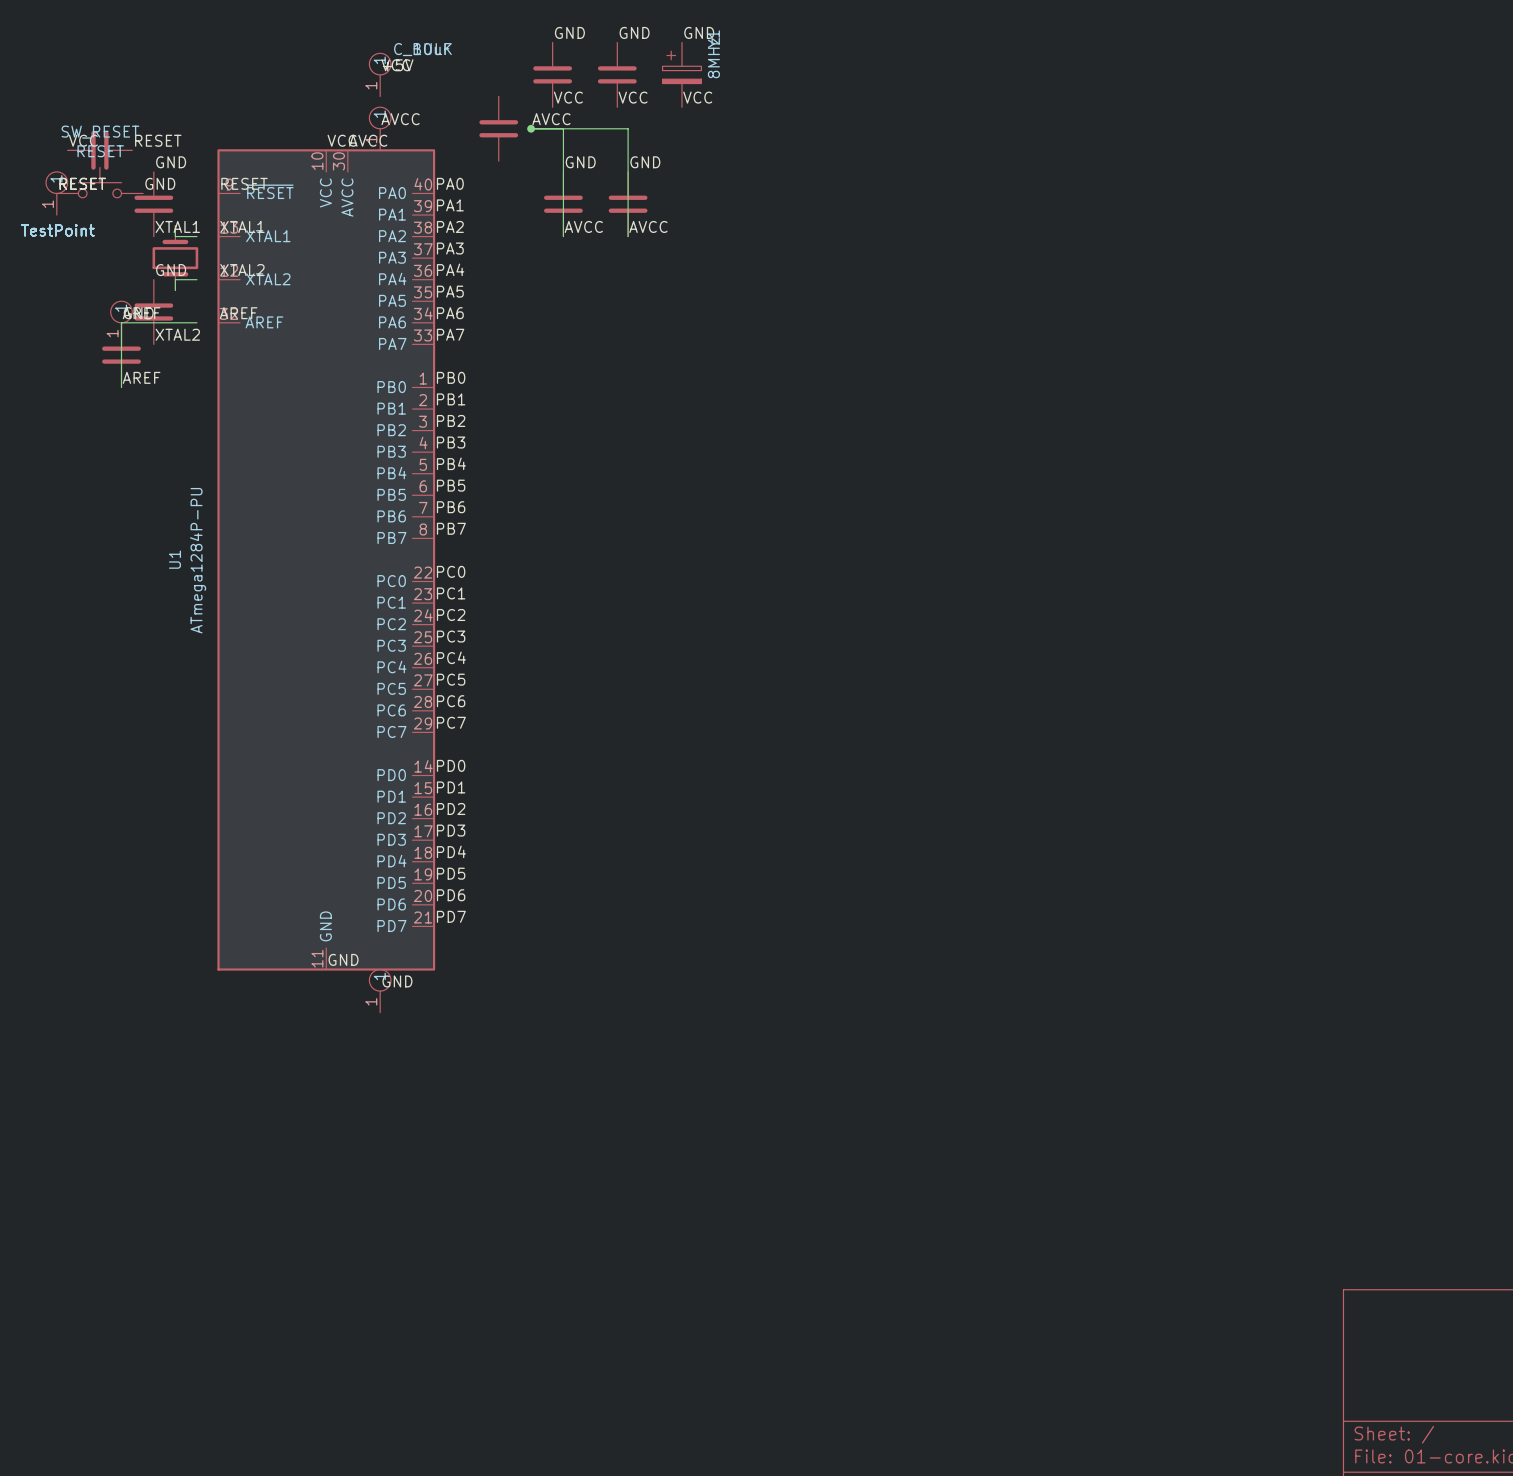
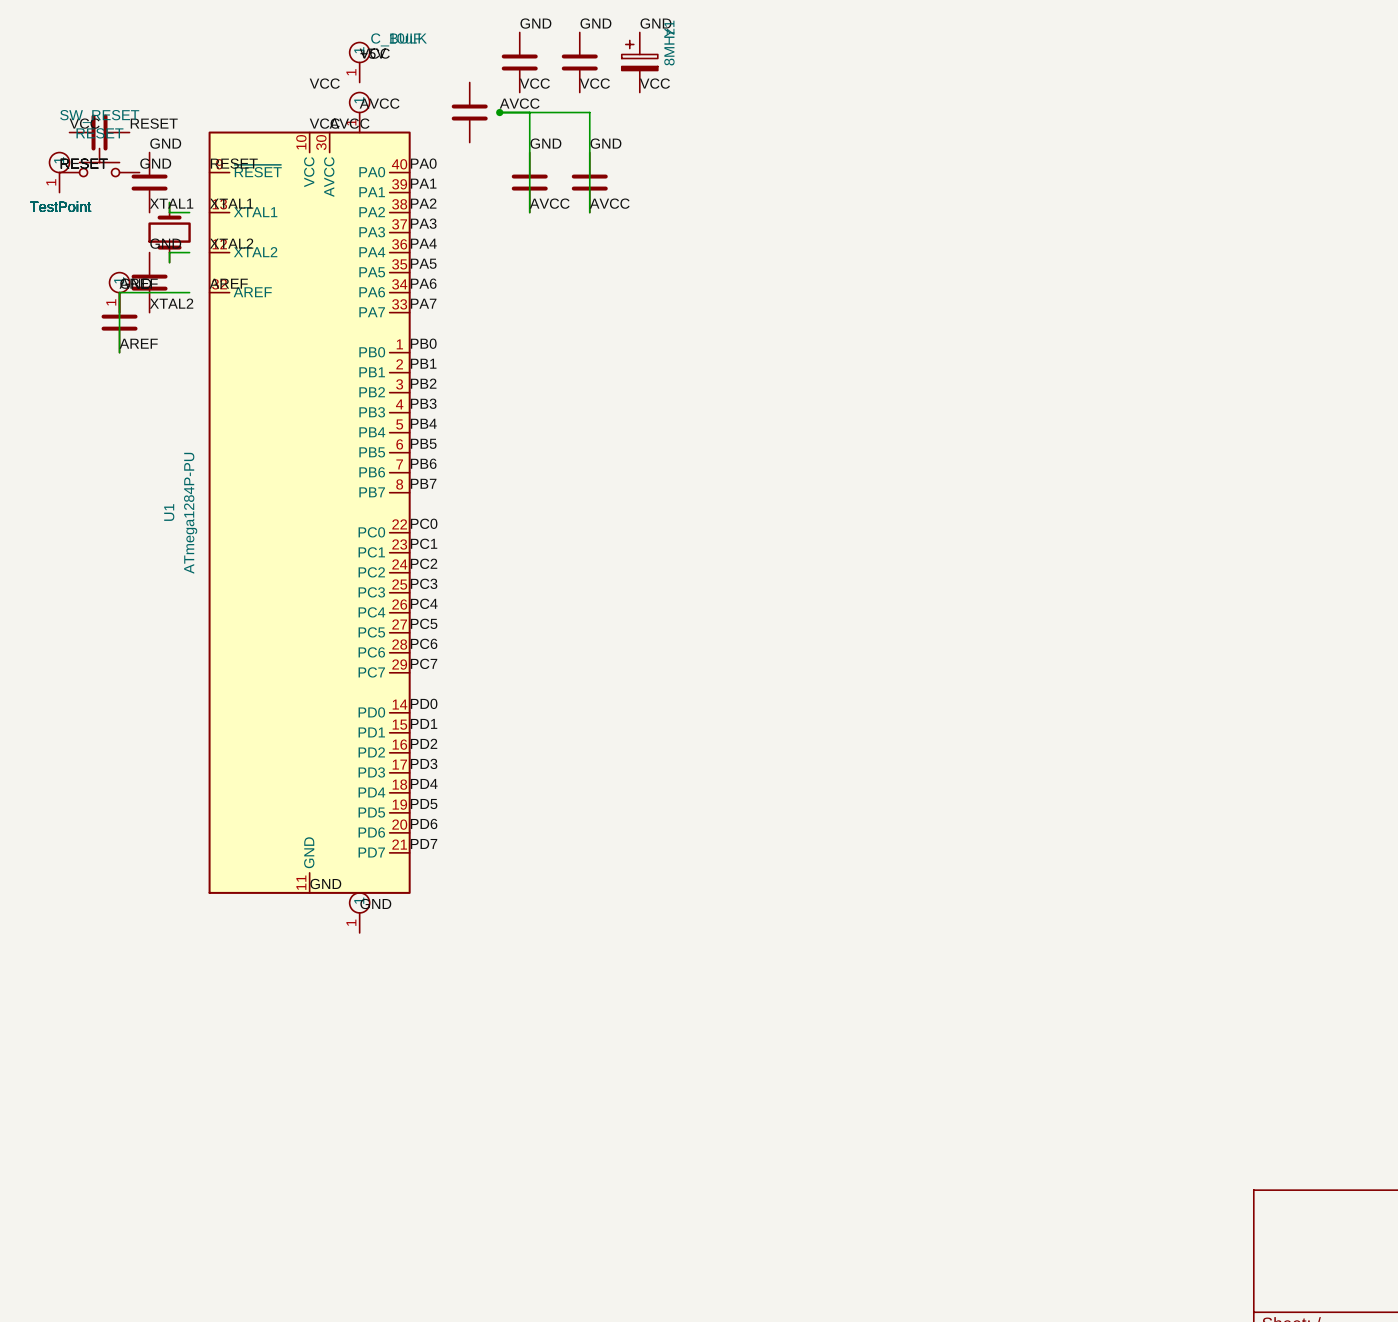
label: none -> VCC (324, 83)

